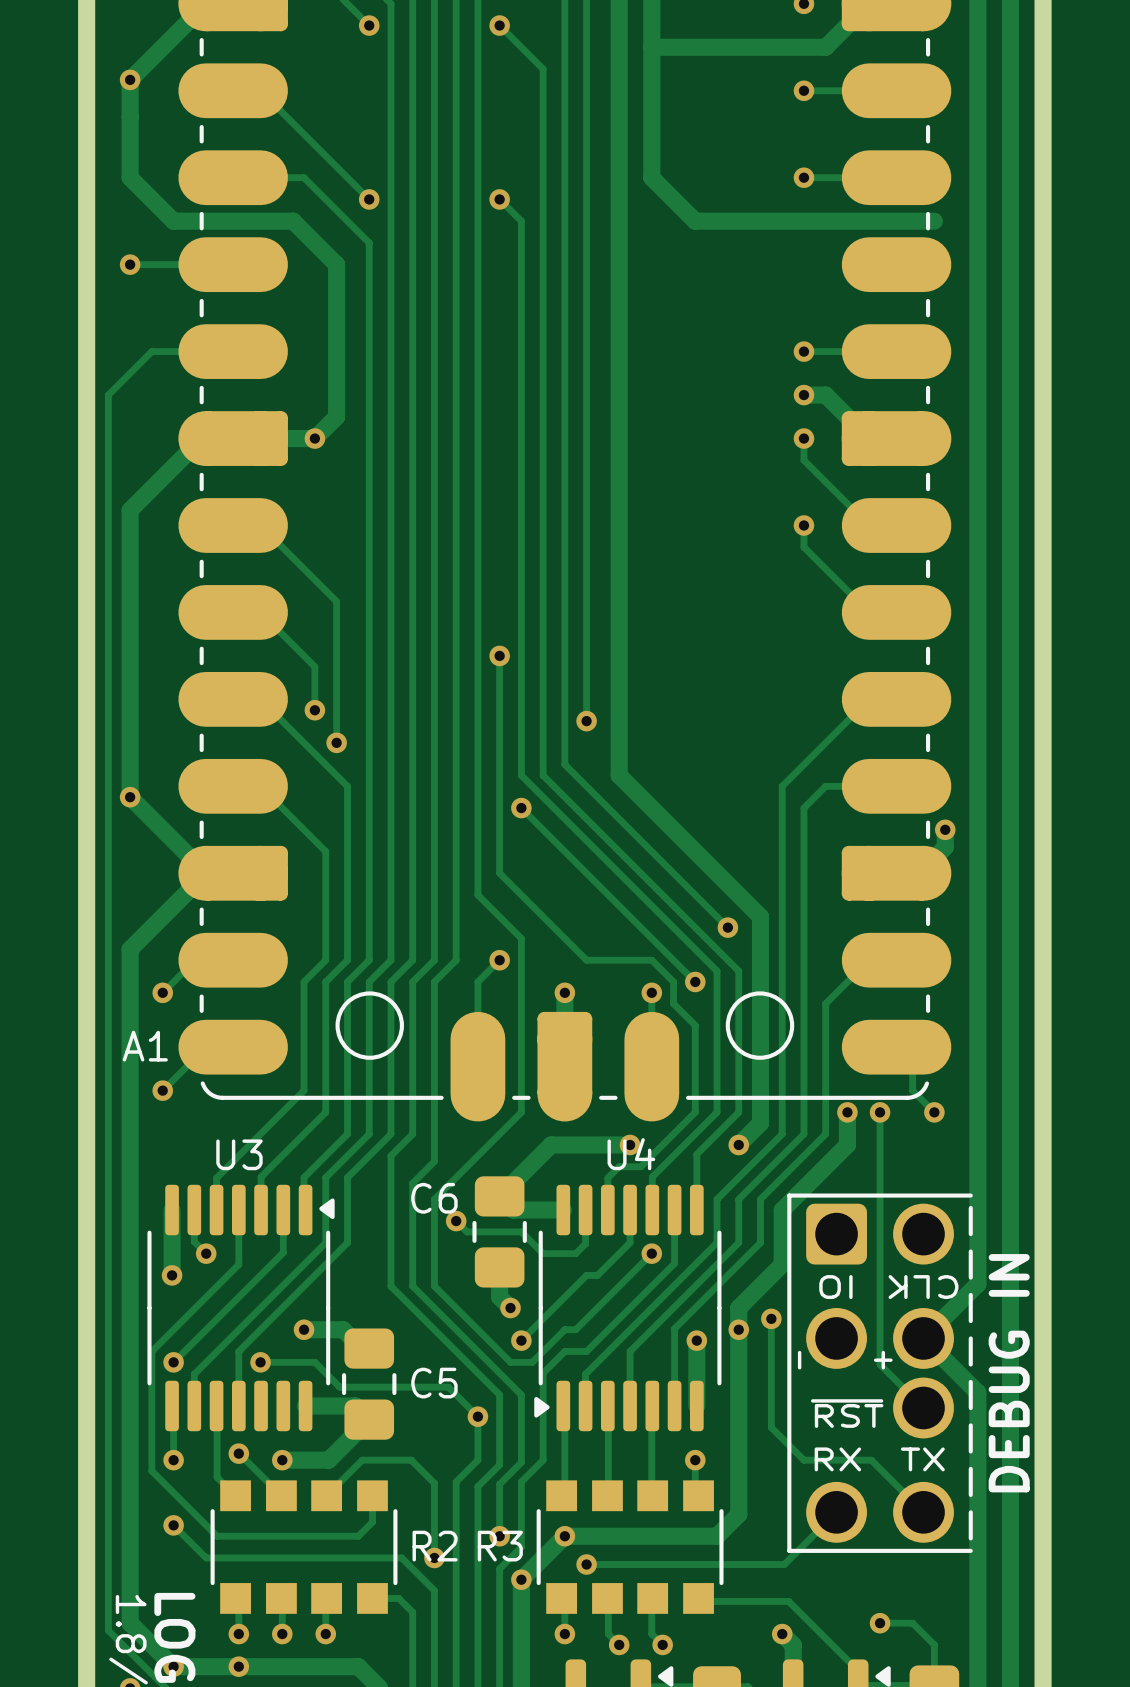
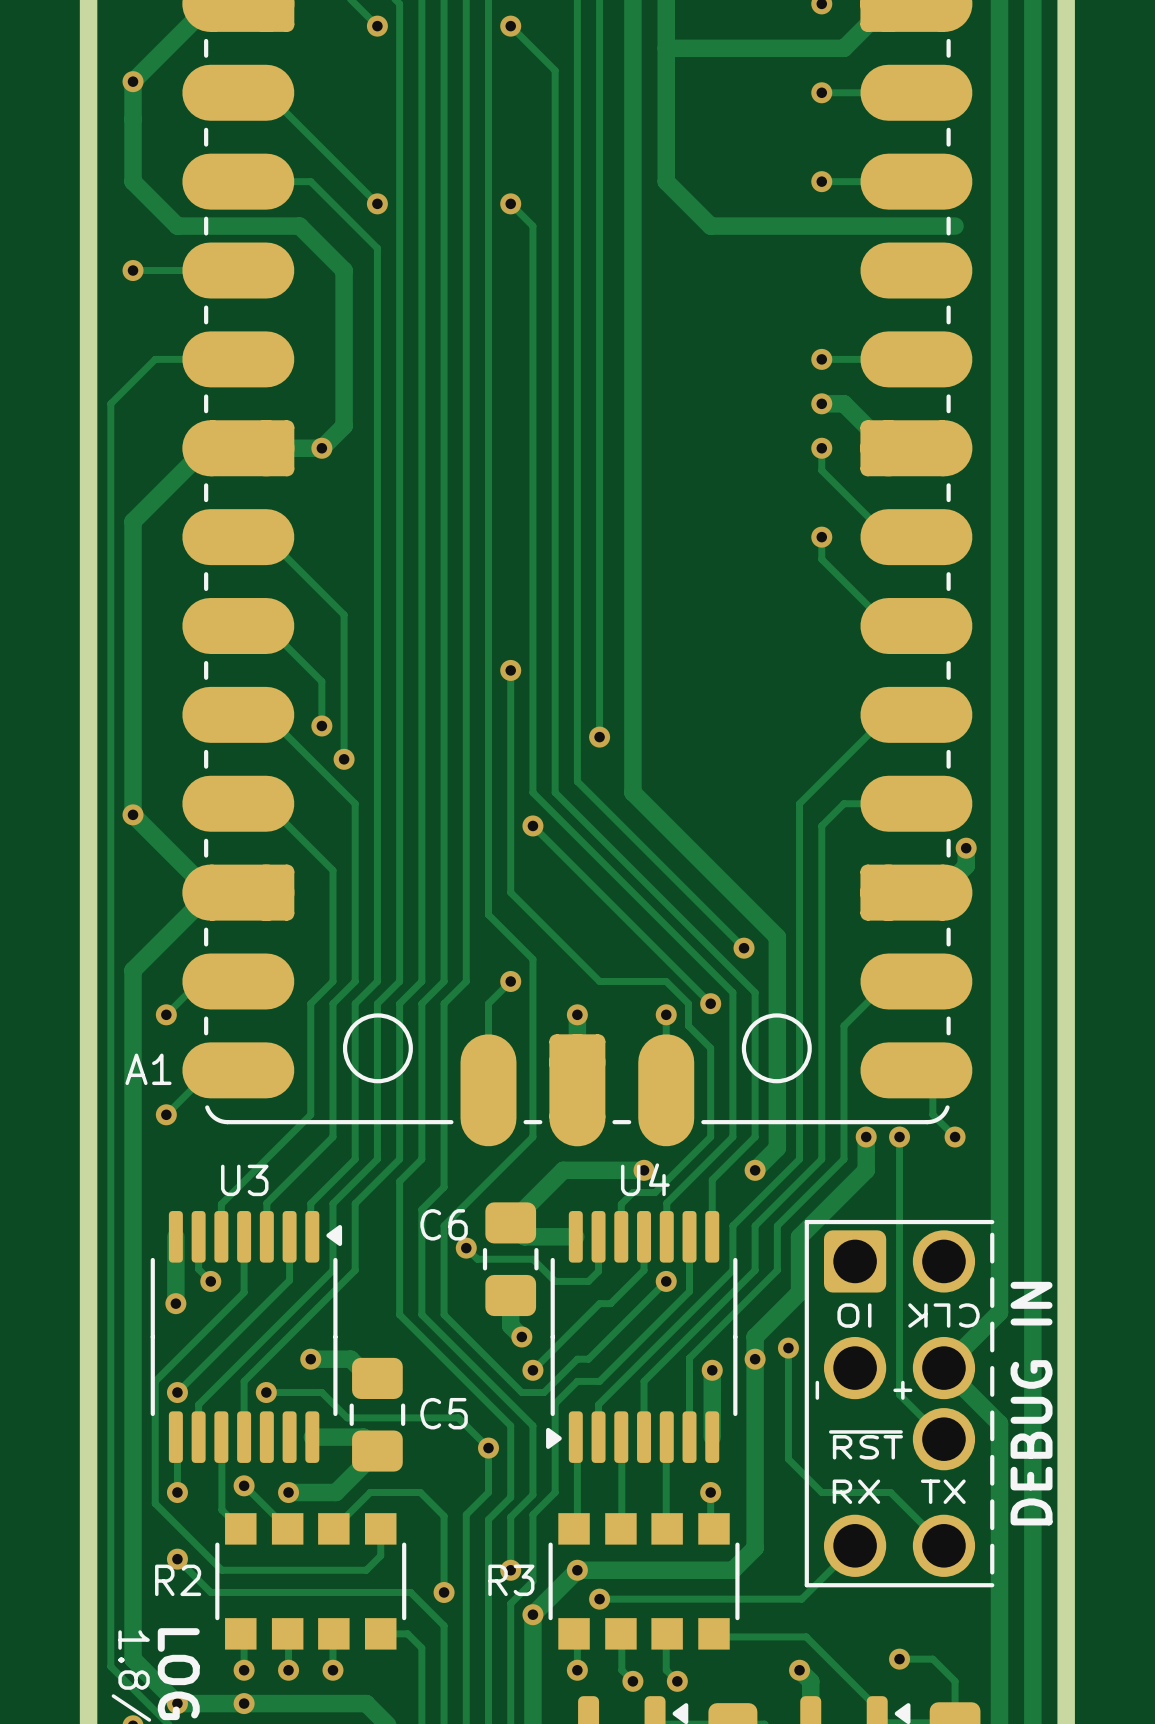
R2 name position: R2 (435, 1546) -> R2 (178, 1580)

